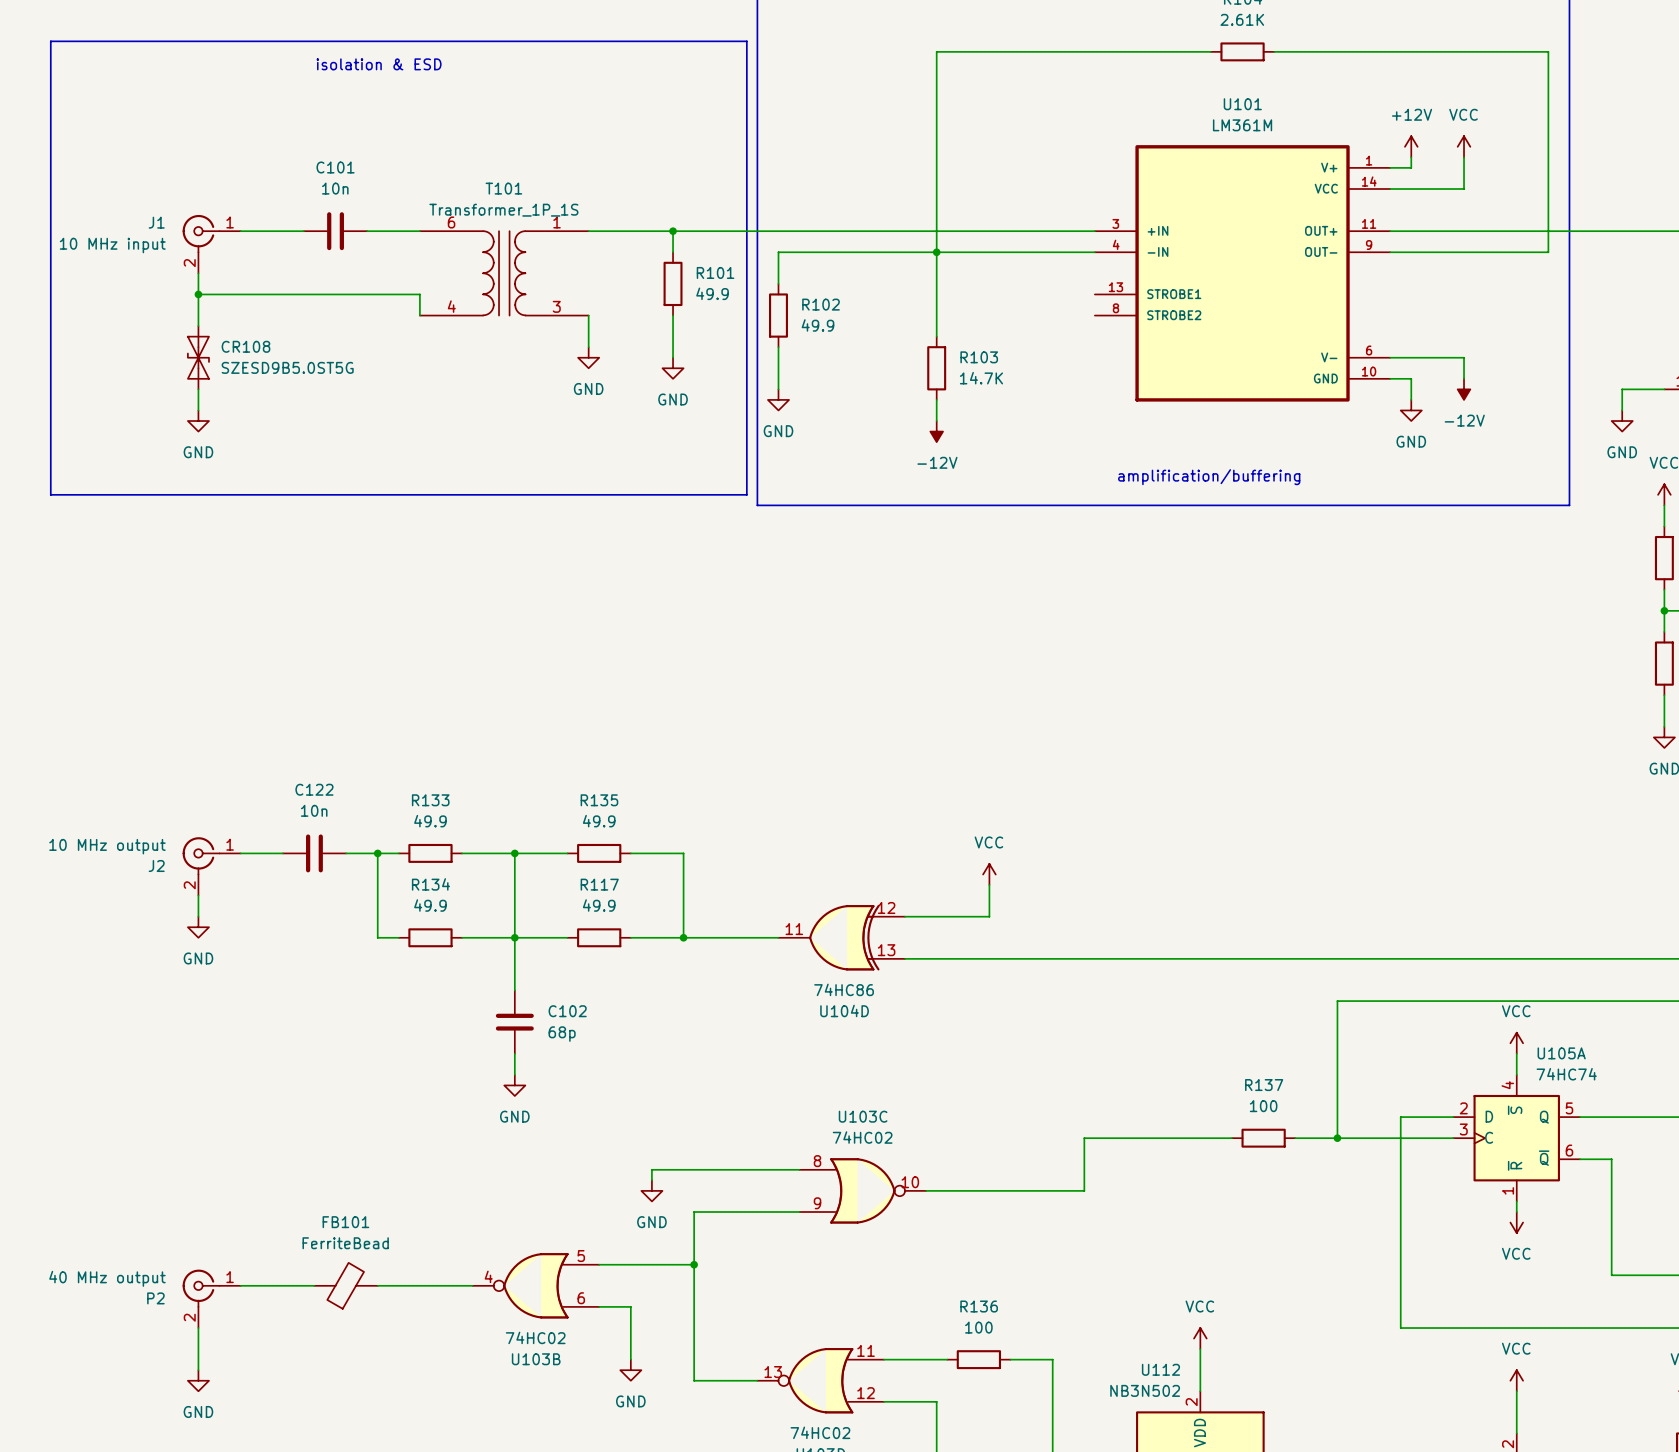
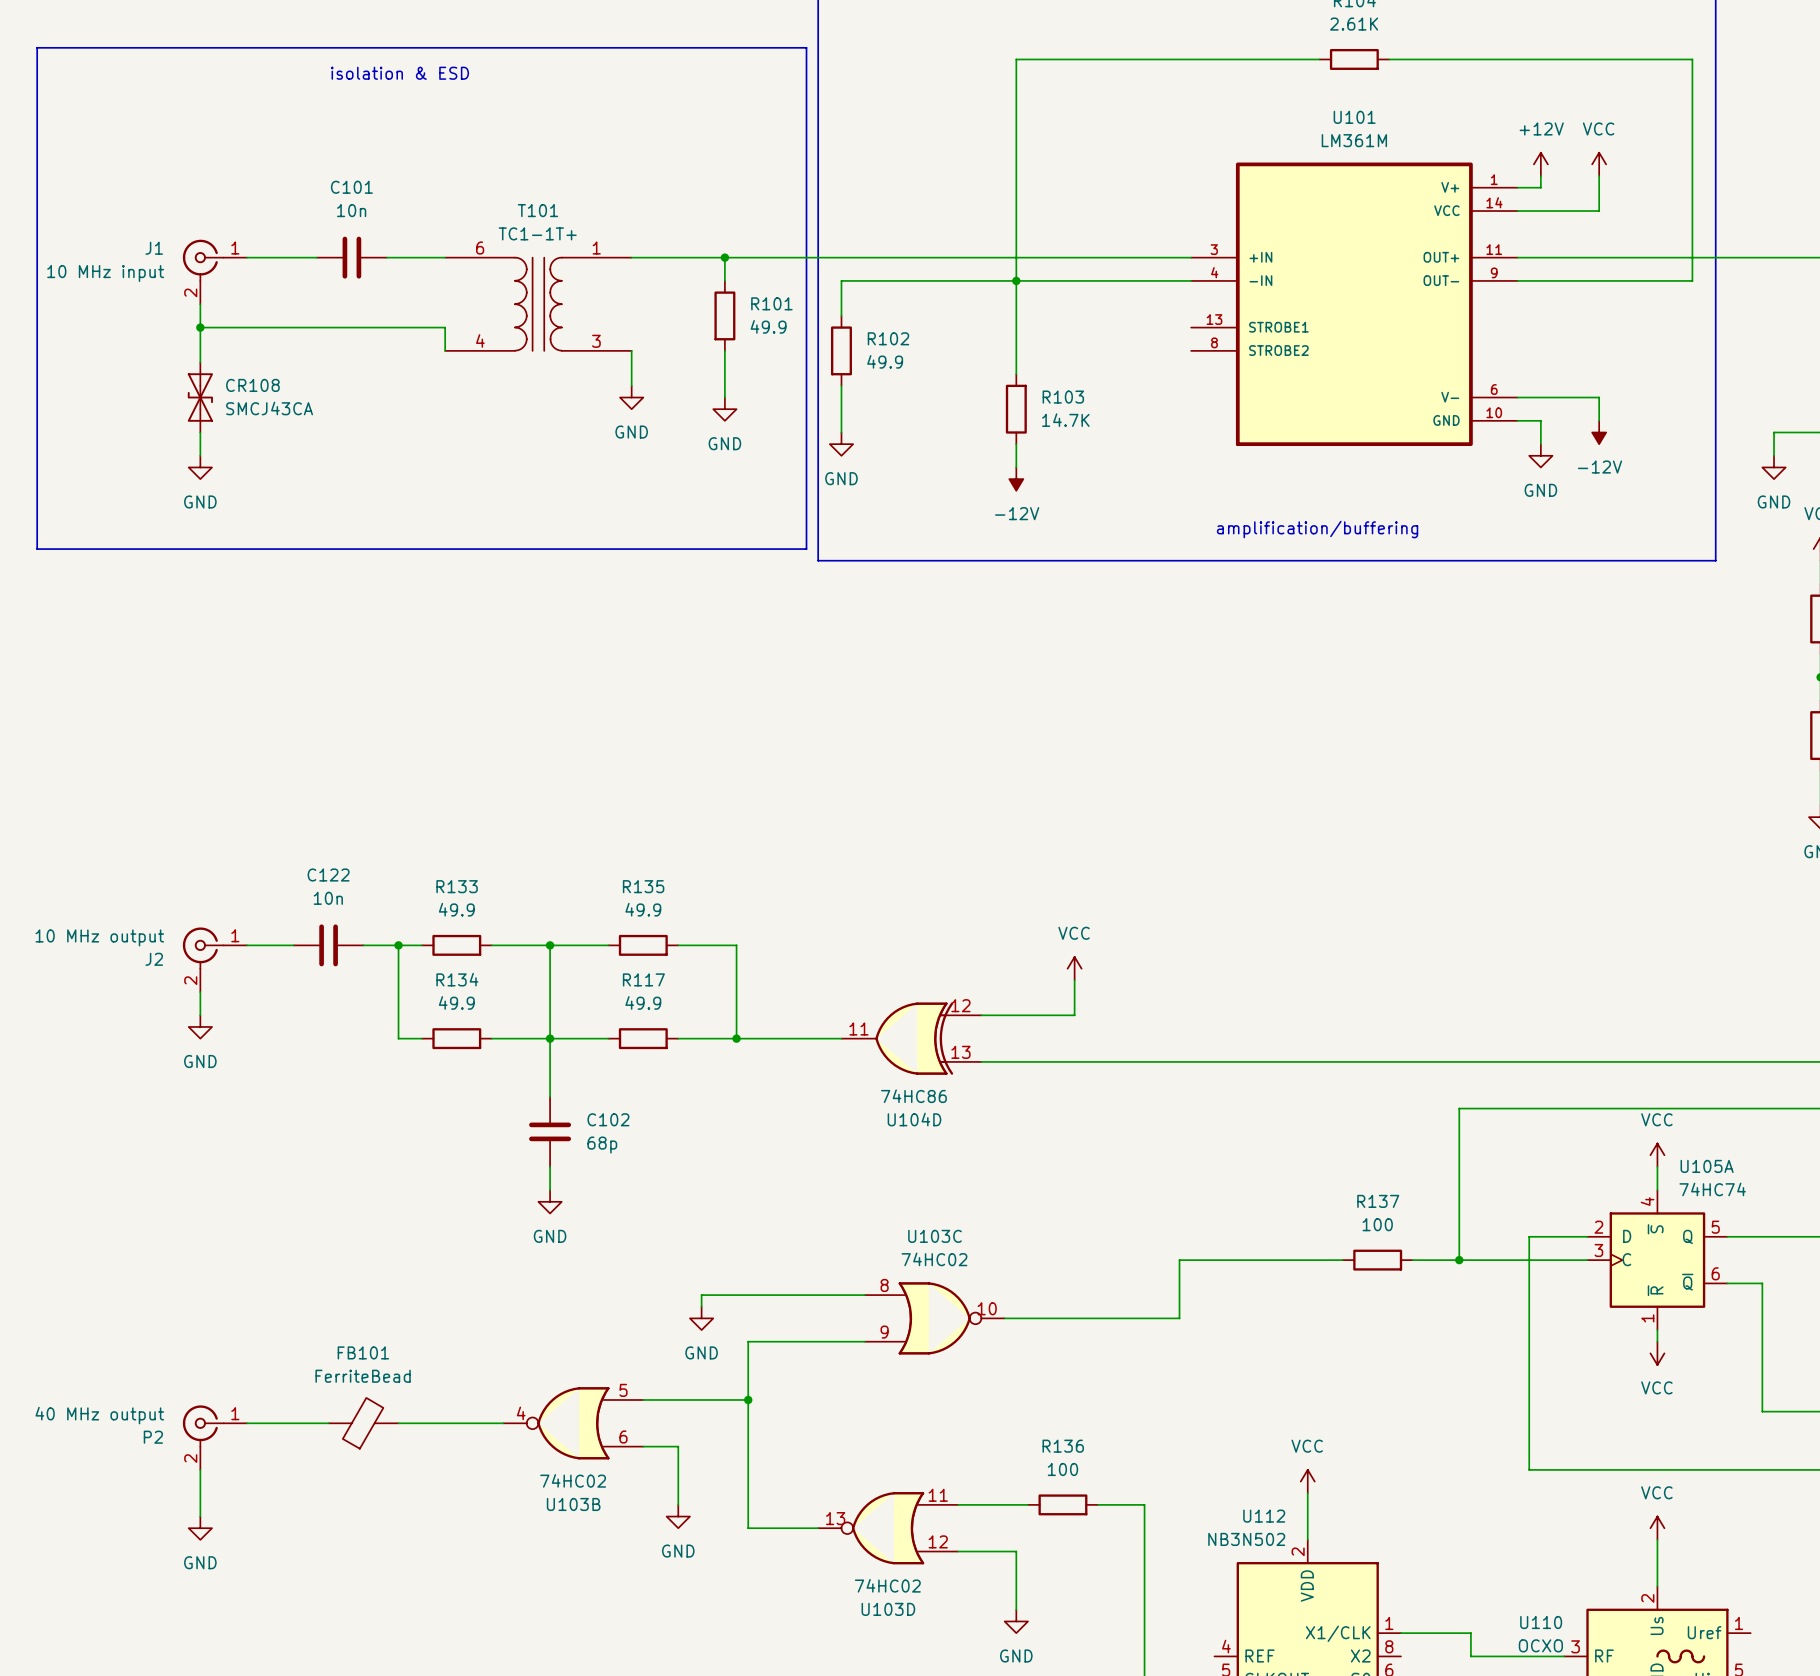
T101 value: Transformer_1P_1S (503, 210) -> TC1-1T+ (537, 233)
CR108 value: SZESD9B5.0ST5G (287, 367) -> SMCJ43CA (269, 408)

